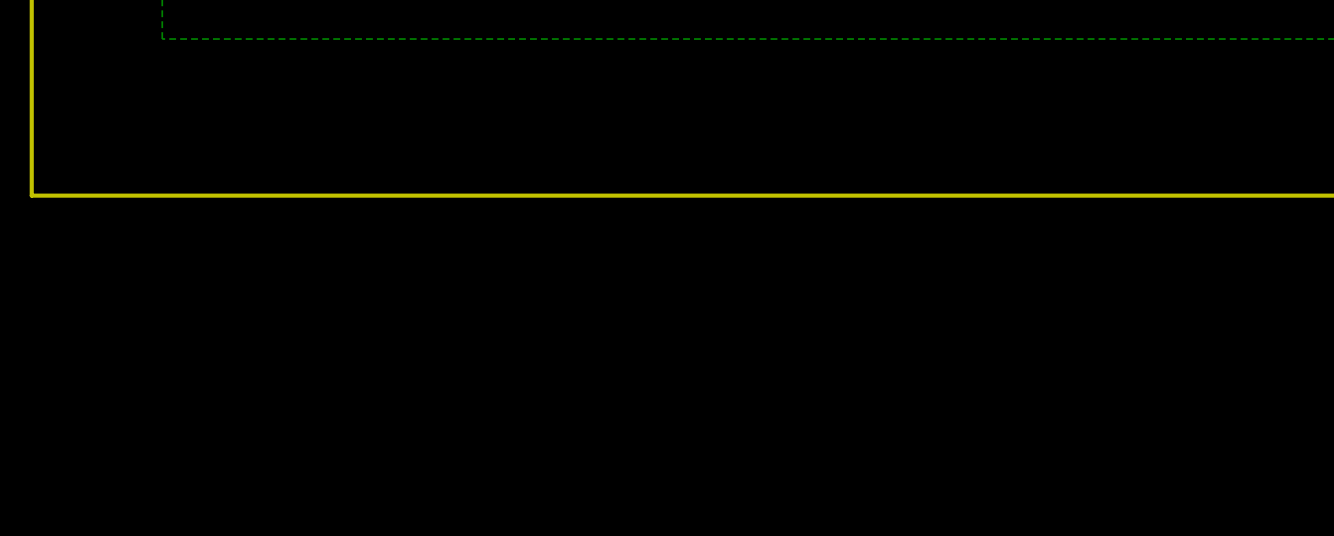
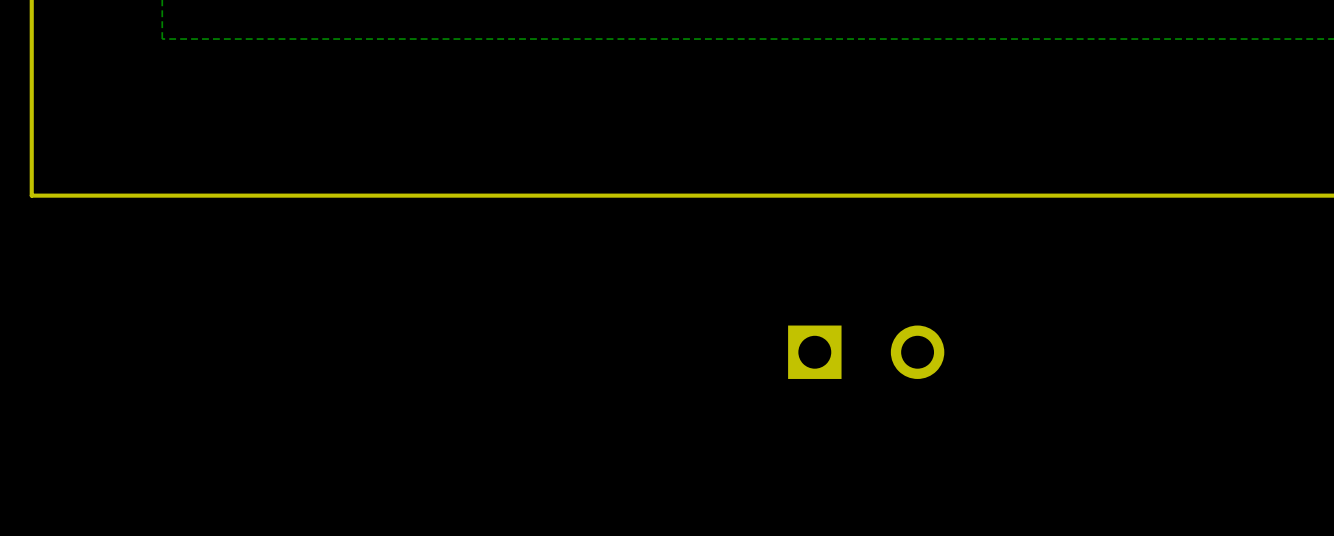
part: none -> (866, 352)

